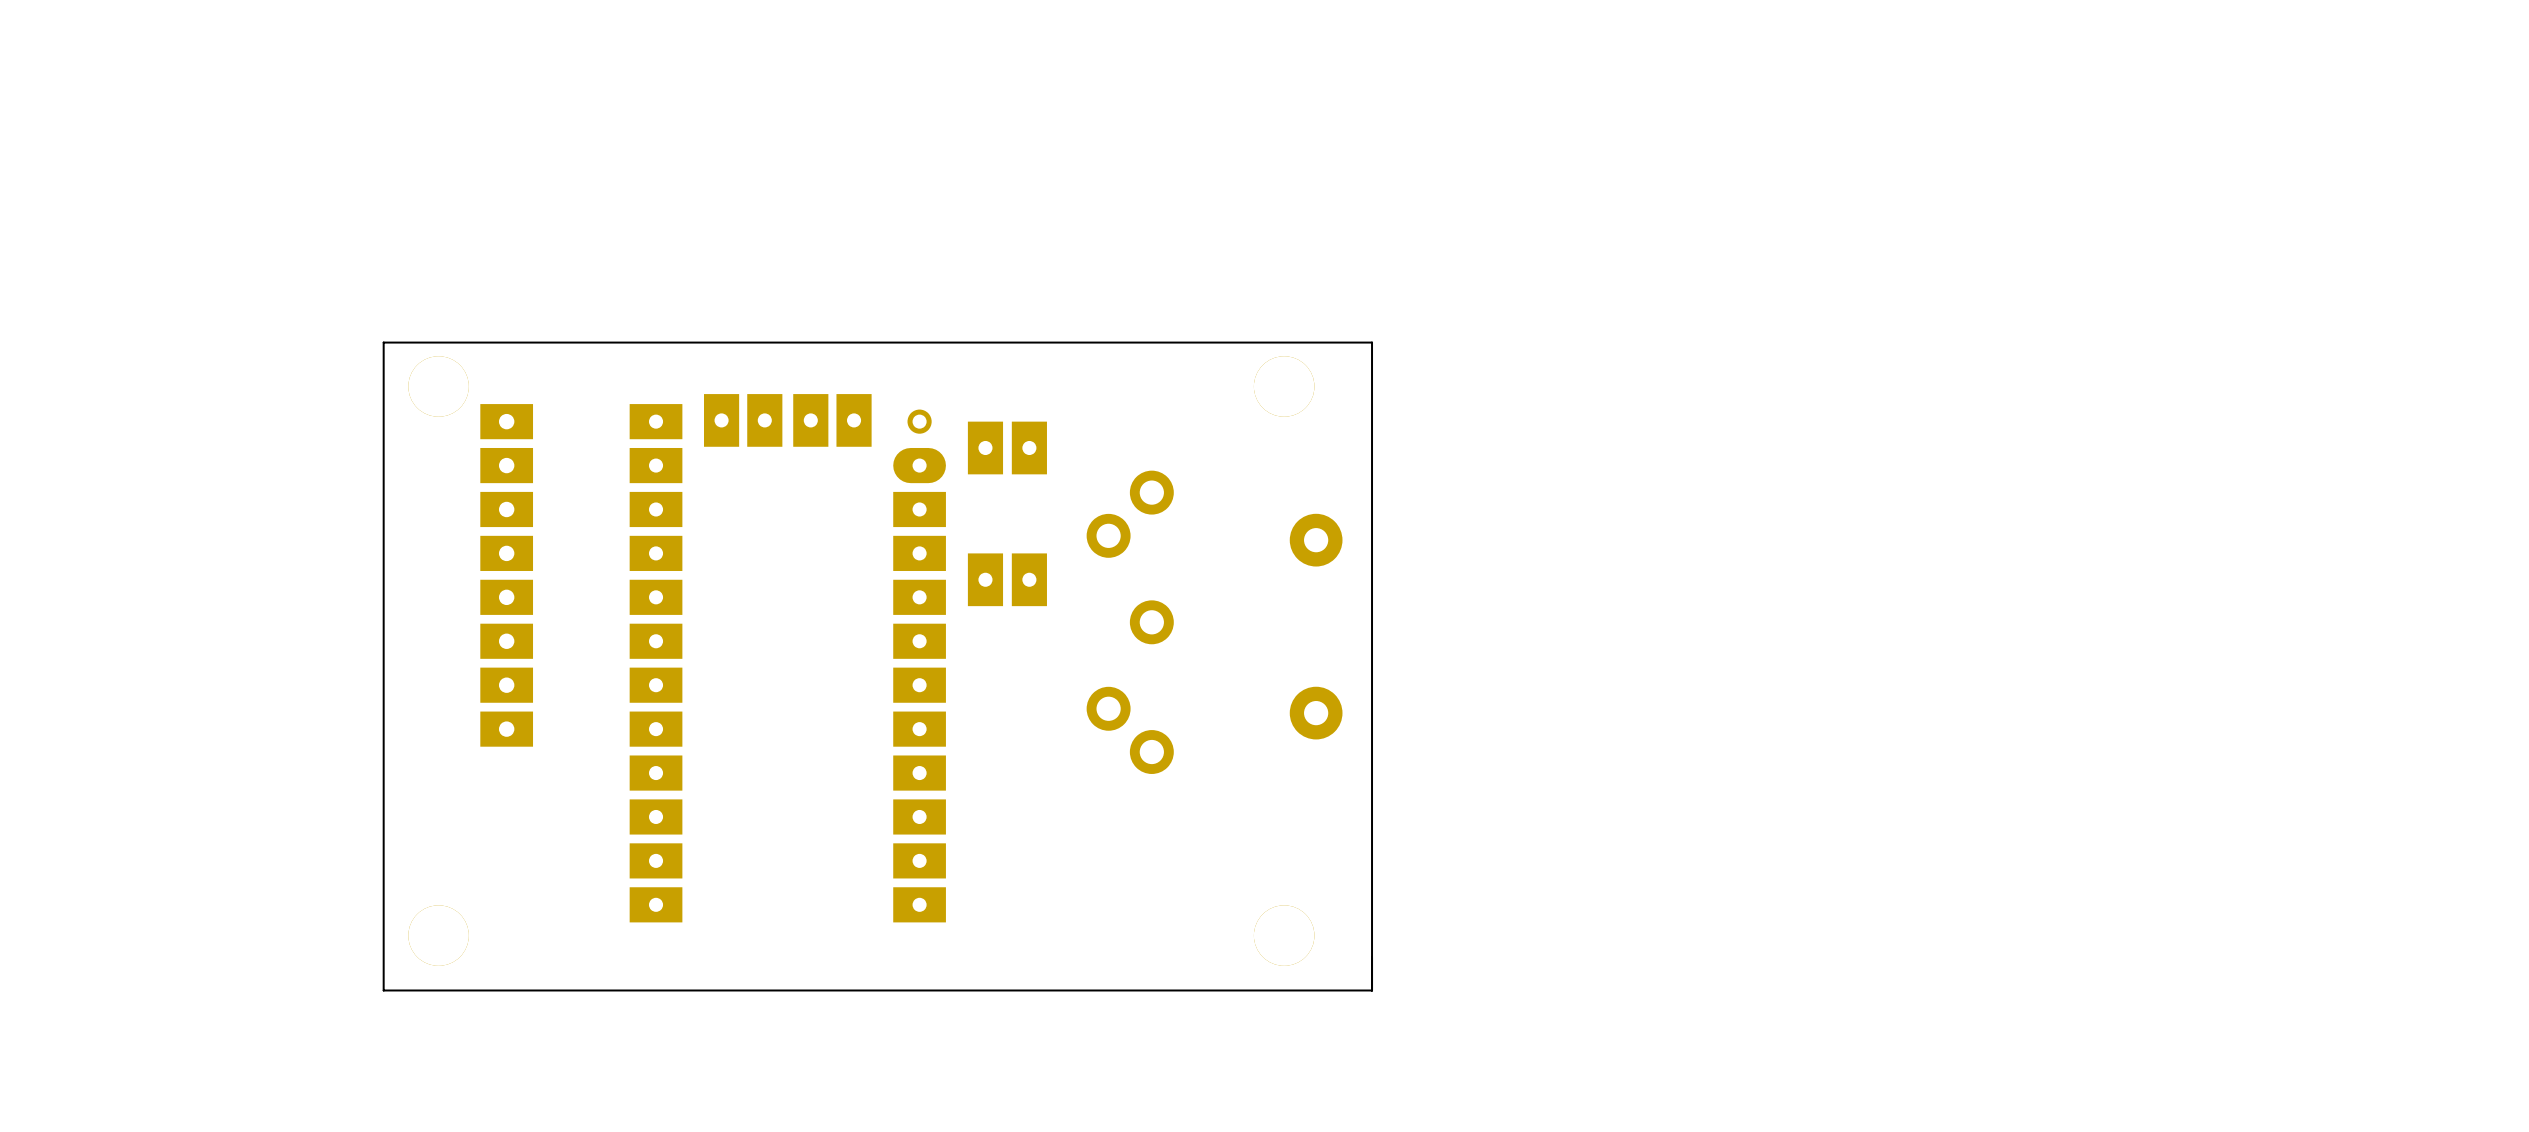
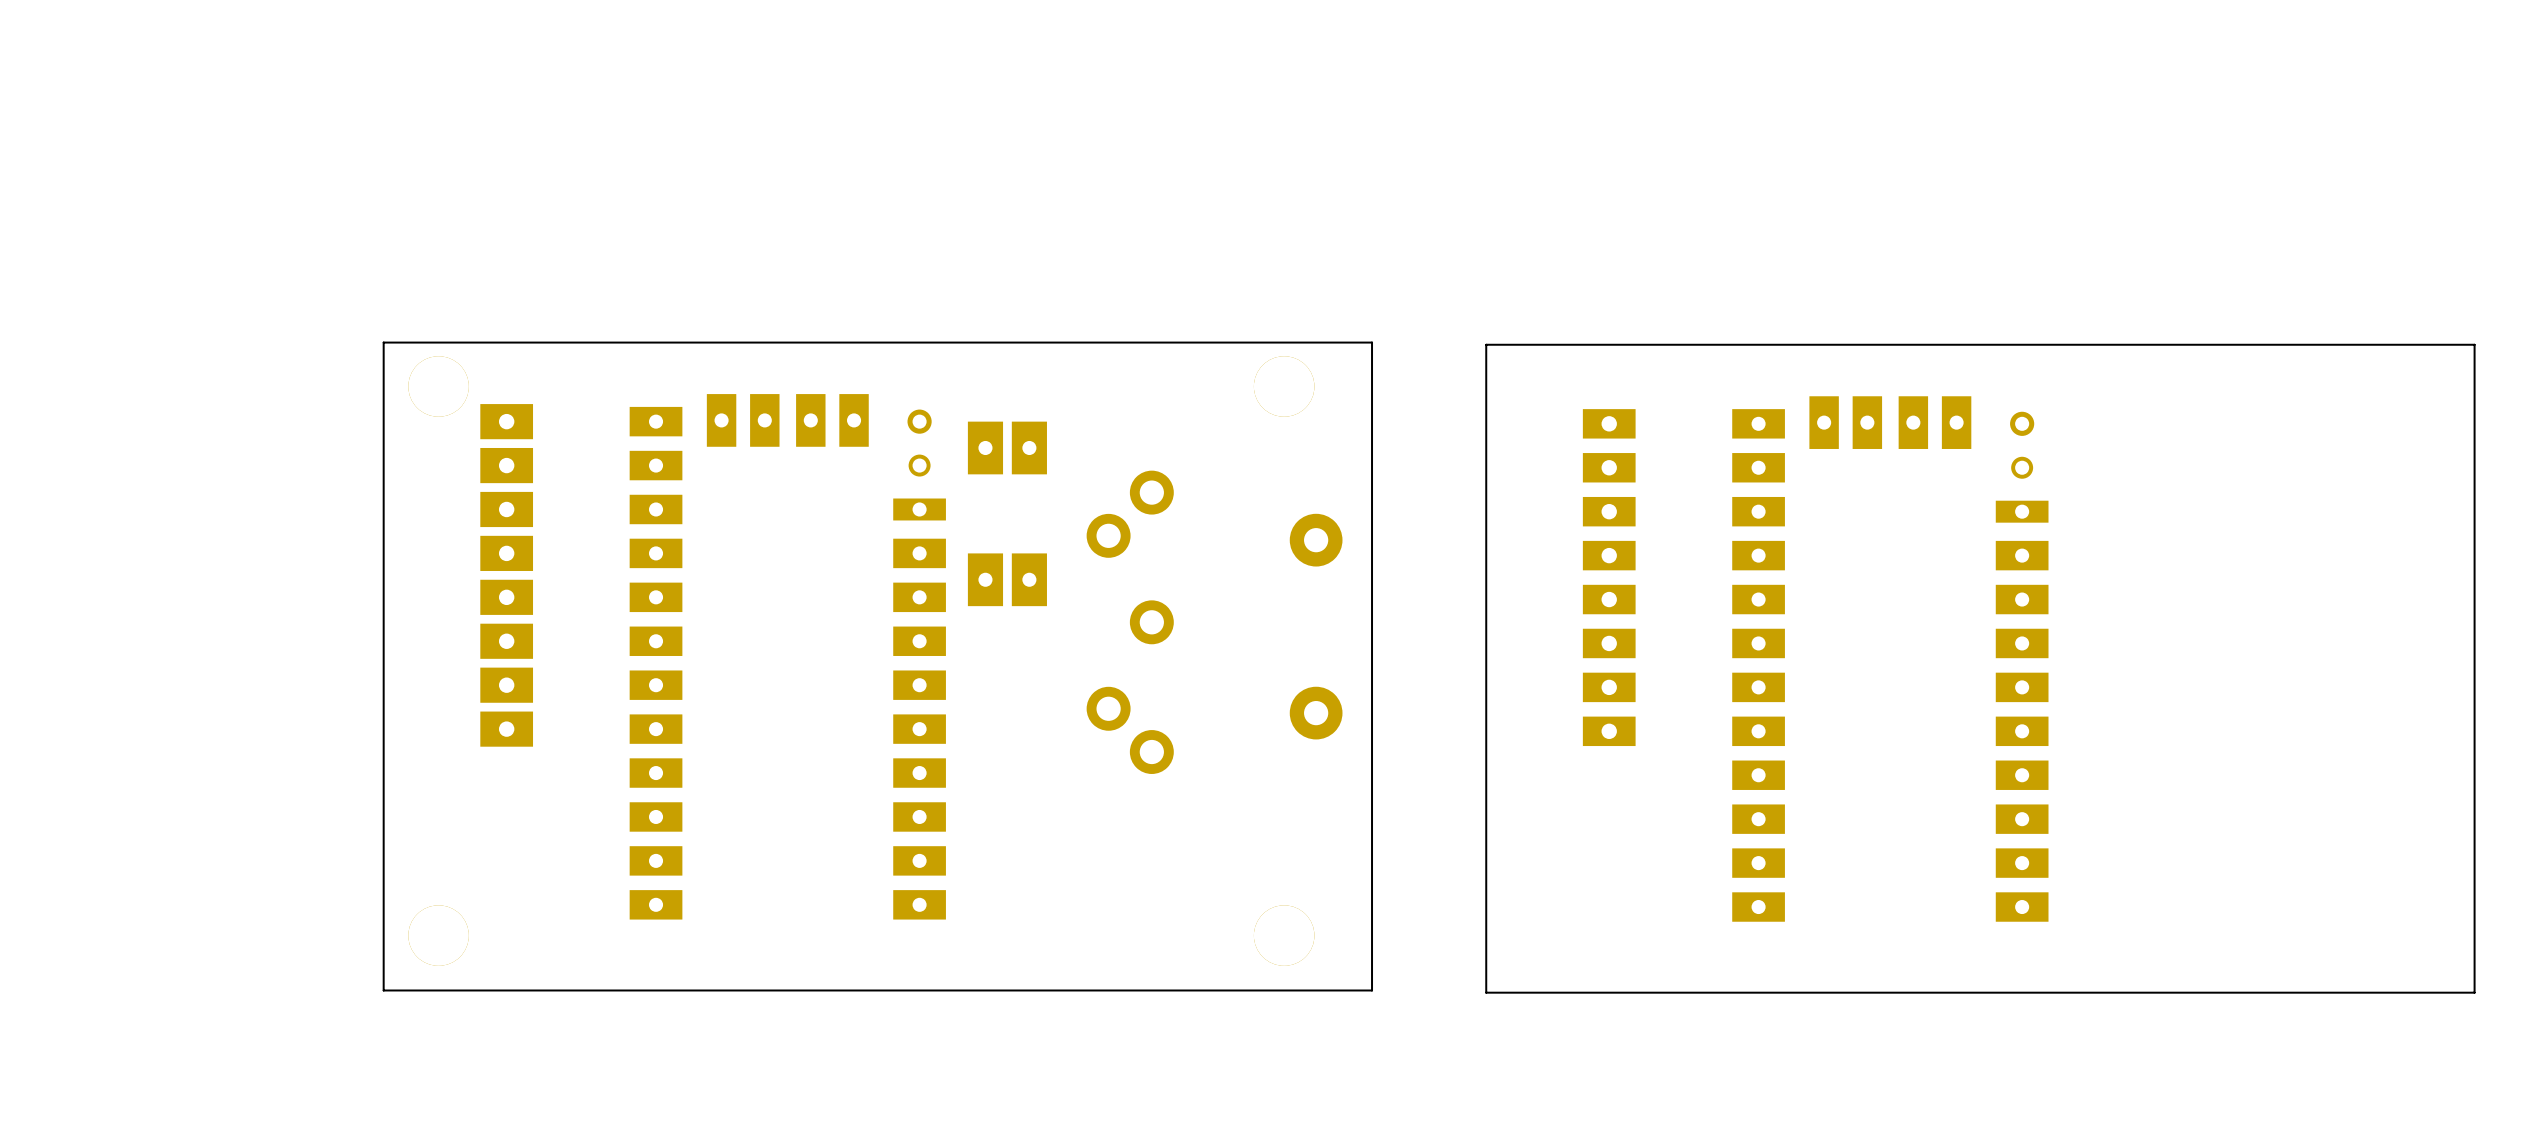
board edge: none -> (2474, 344) (2474, 992) (1486, 992) (1486, 344) (2474, 344)
part footprint: [629, 394, 946, 923] -> [629, 394, 946, 920]
part: none -> (1609, 577)
part: none -> (1890, 659)

